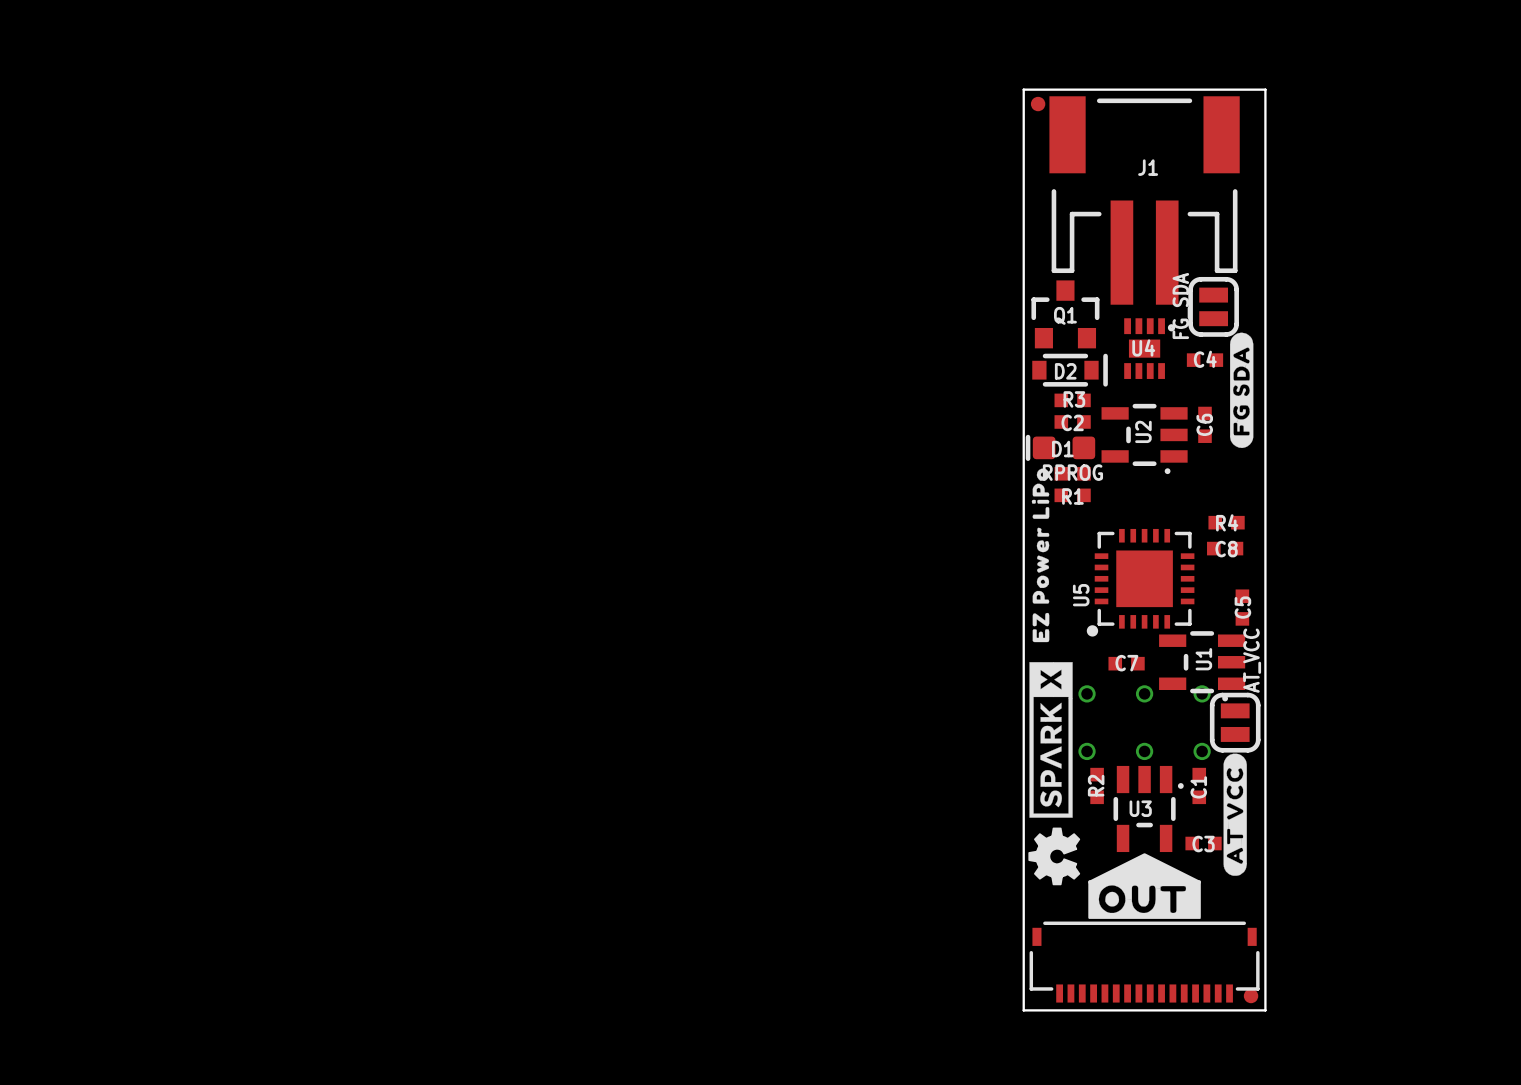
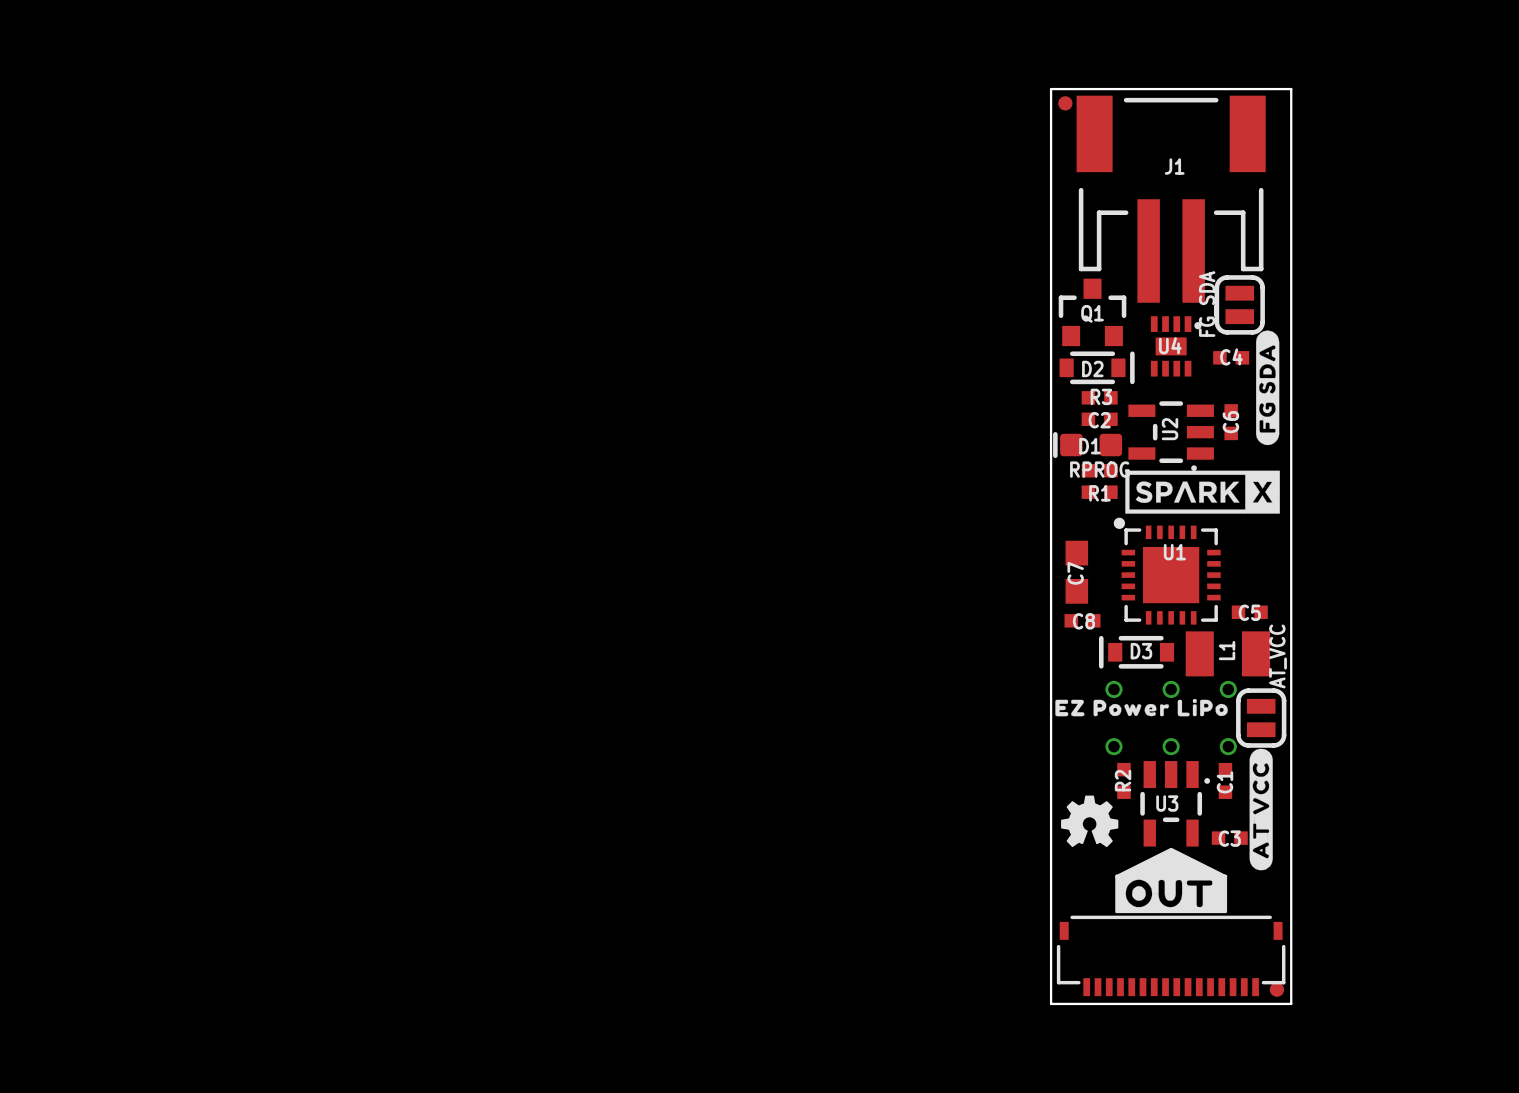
drawing: [1028, 468, 1081, 886] -> none
drawing: none -> [1125, 470, 1280, 514]
R4: (1226, 522) -> none
C8 position: (1225, 548) -> (1082, 620)
U5: (1140, 582) -> none
C5 rotation: 0° (1242, 607) -> 90° clockwise (1249, 612)
U1 footprint: [1159, 631, 1246, 702] -> [1113, 517, 1221, 625]
C7 footprint: [1108, 656, 1145, 671] -> [1065, 540, 1089, 604]
D3: none -> (1136, 652)
L1: none -> (1227, 653)
drawing: none -> [1055, 698, 1228, 717]
drawing: none -> [1061, 795, 1119, 848]

